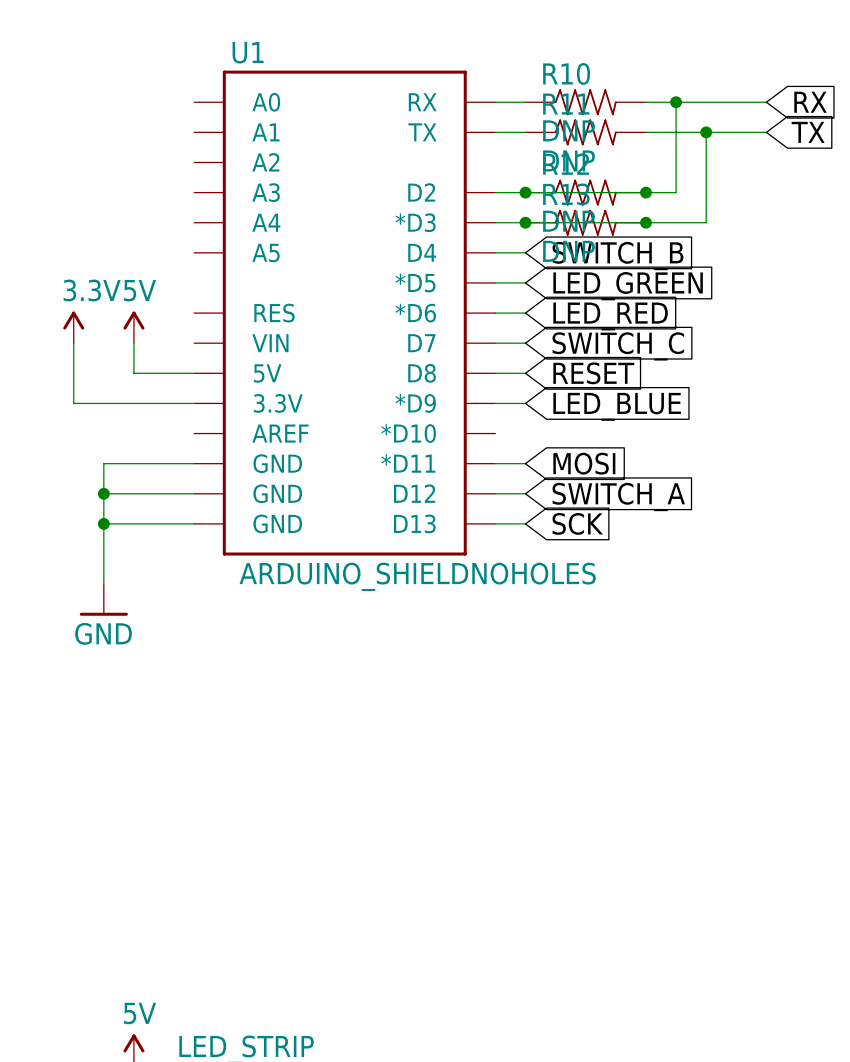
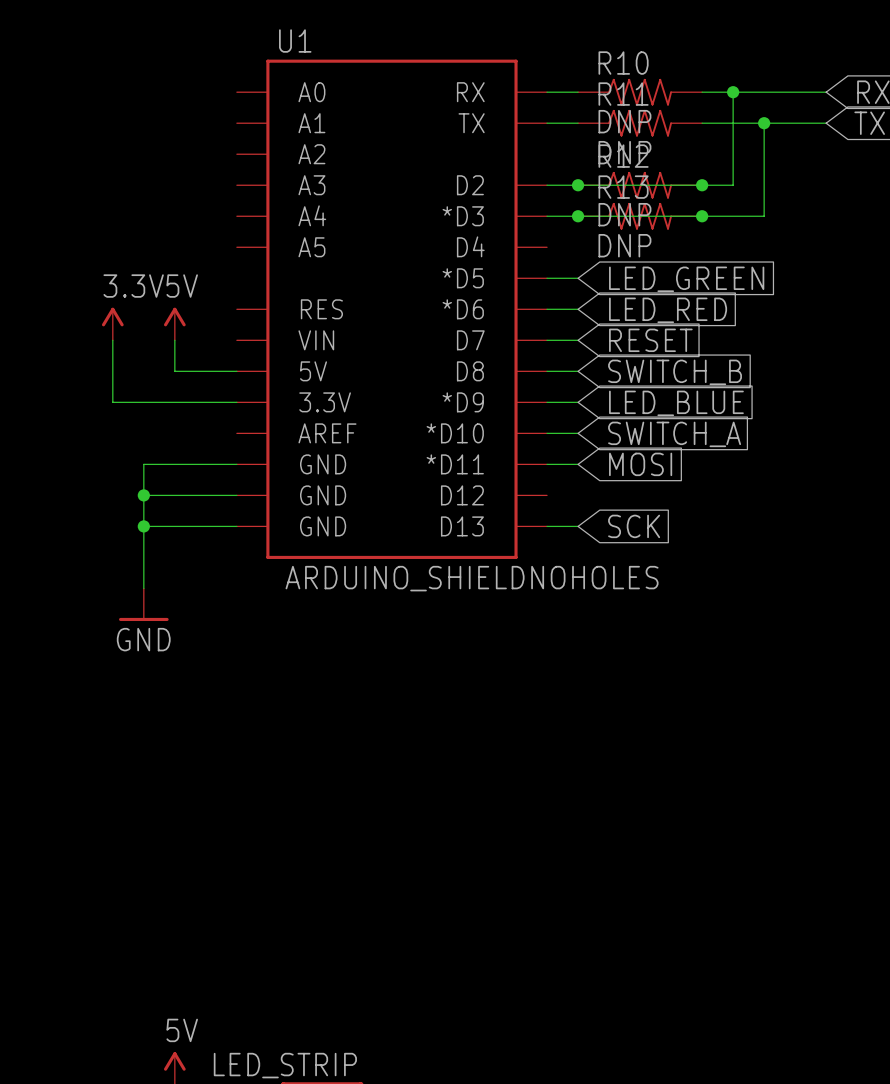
wire: (495, 252) (525, 252) -> none
global label: SWITCH_B (617, 256) -> none
global label: SWITCH_C (618, 346) -> RESET (650, 340)
global label: RESET (593, 373) -> SWITCH_B (675, 372)
wire: (495, 493) (525, 493) -> (547, 433) (578, 433)
global label position: SWITCH_A (618, 497) -> SWITCH_A (674, 434)

